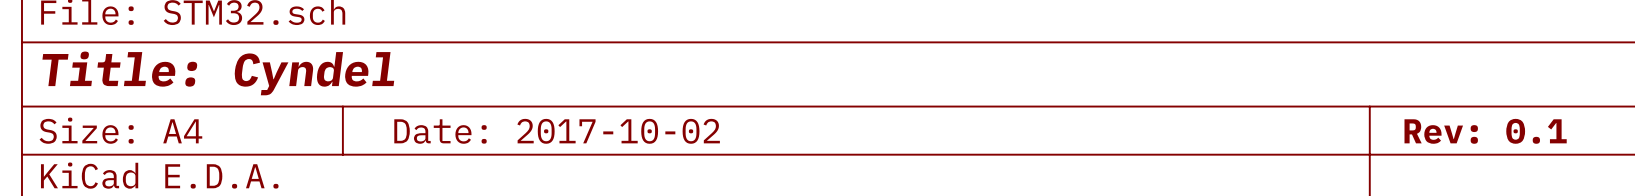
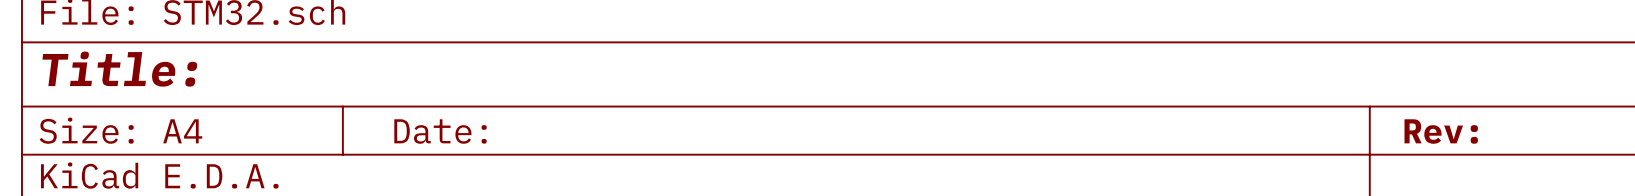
title block: Title: Cyndel (218, 73) -> Title: (119, 69)
title block: Date: 2017-10-02 (557, 131) -> Date: (440, 131)
title block: Rev: 0.1 (1485, 131) -> Rev: (1441, 131)

